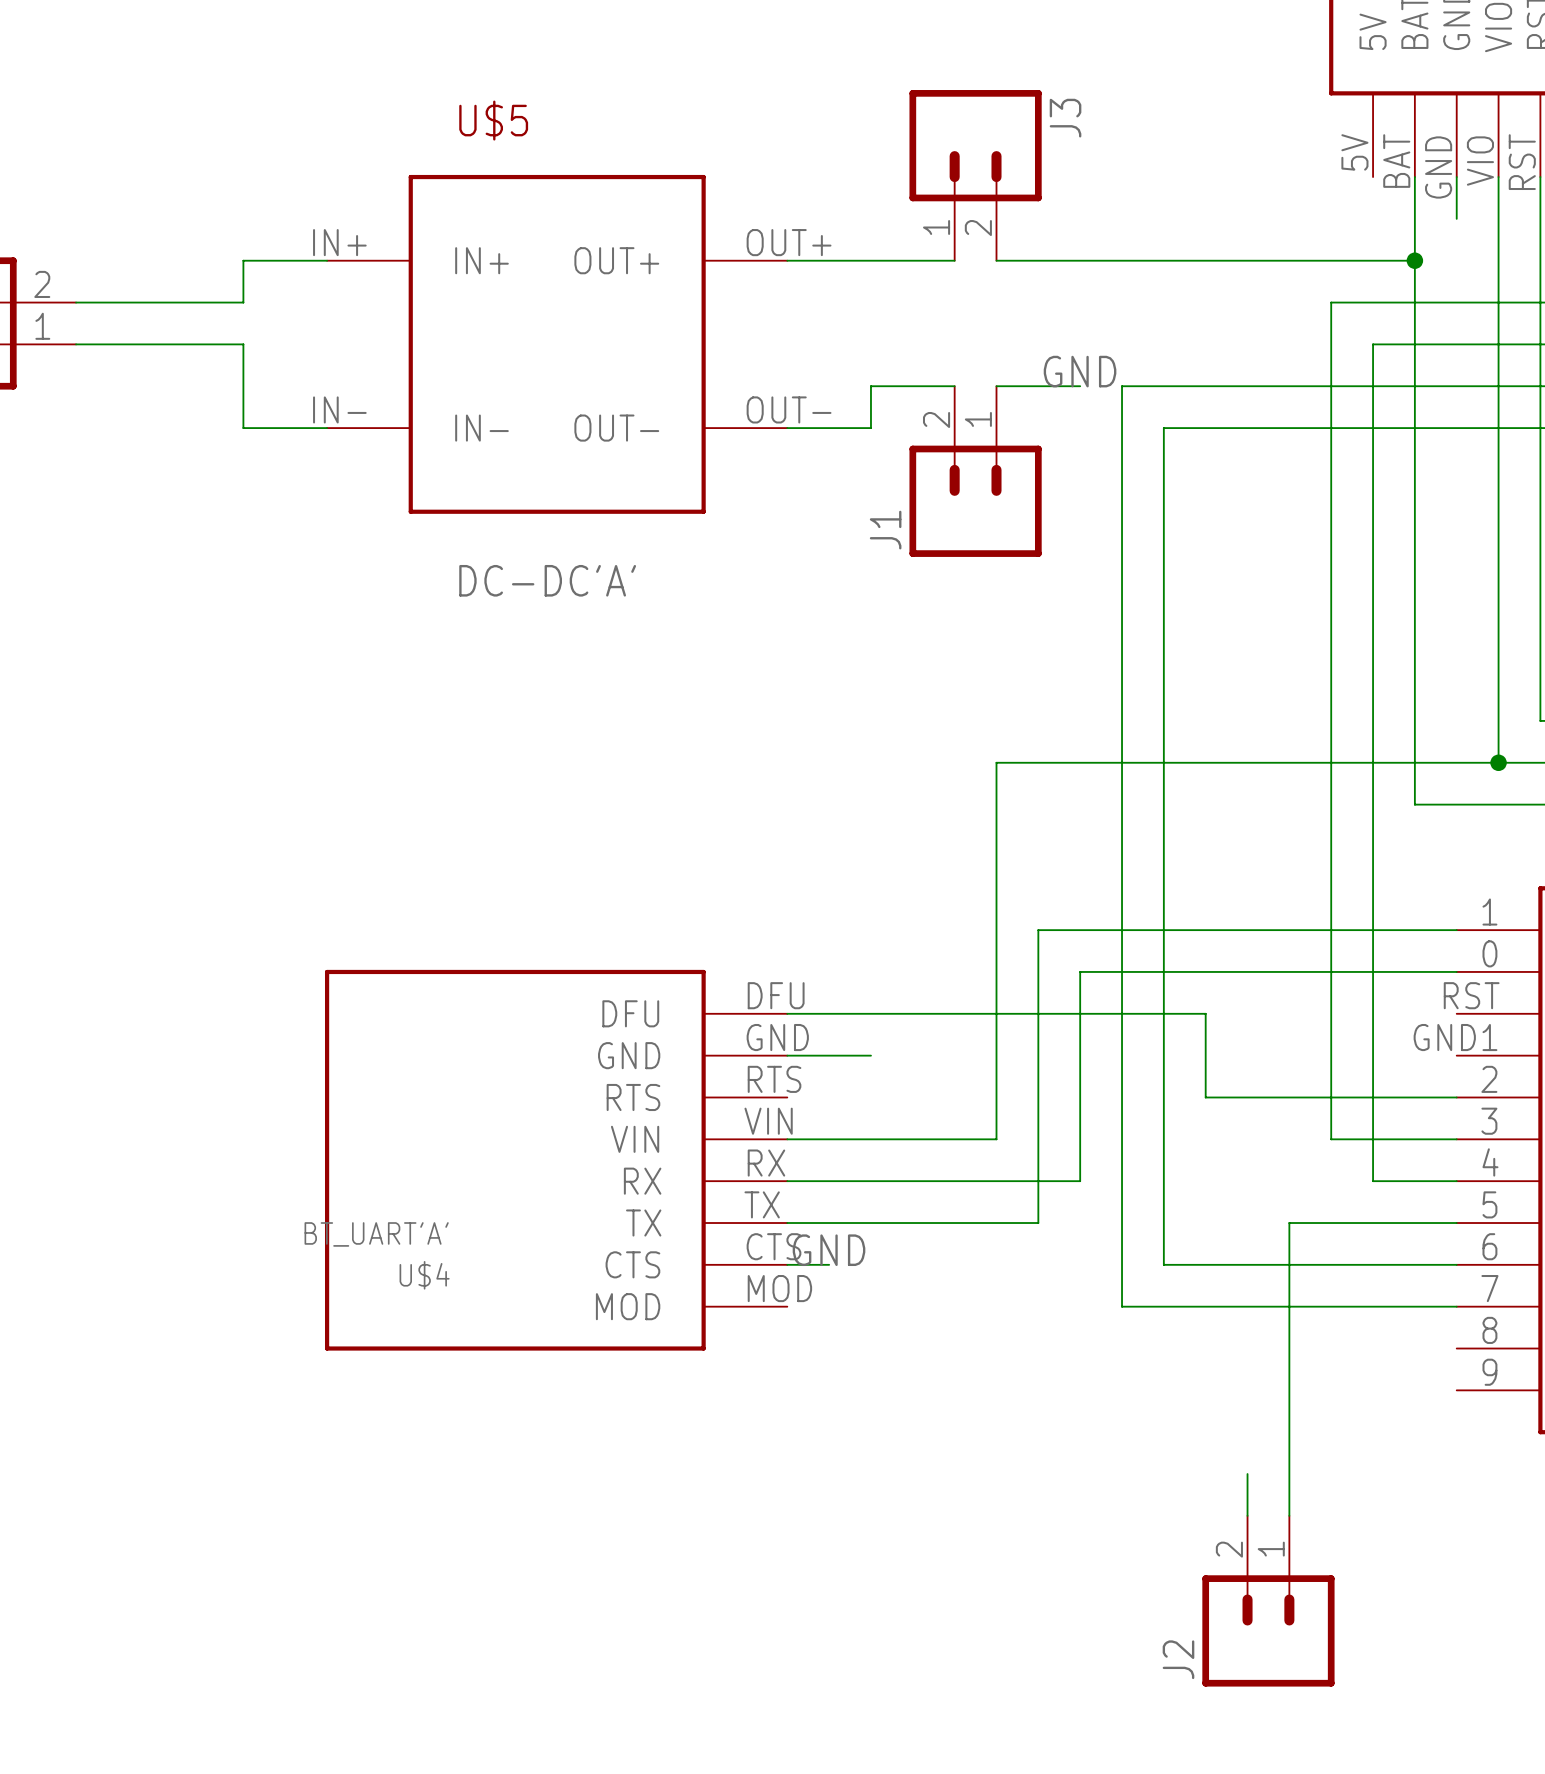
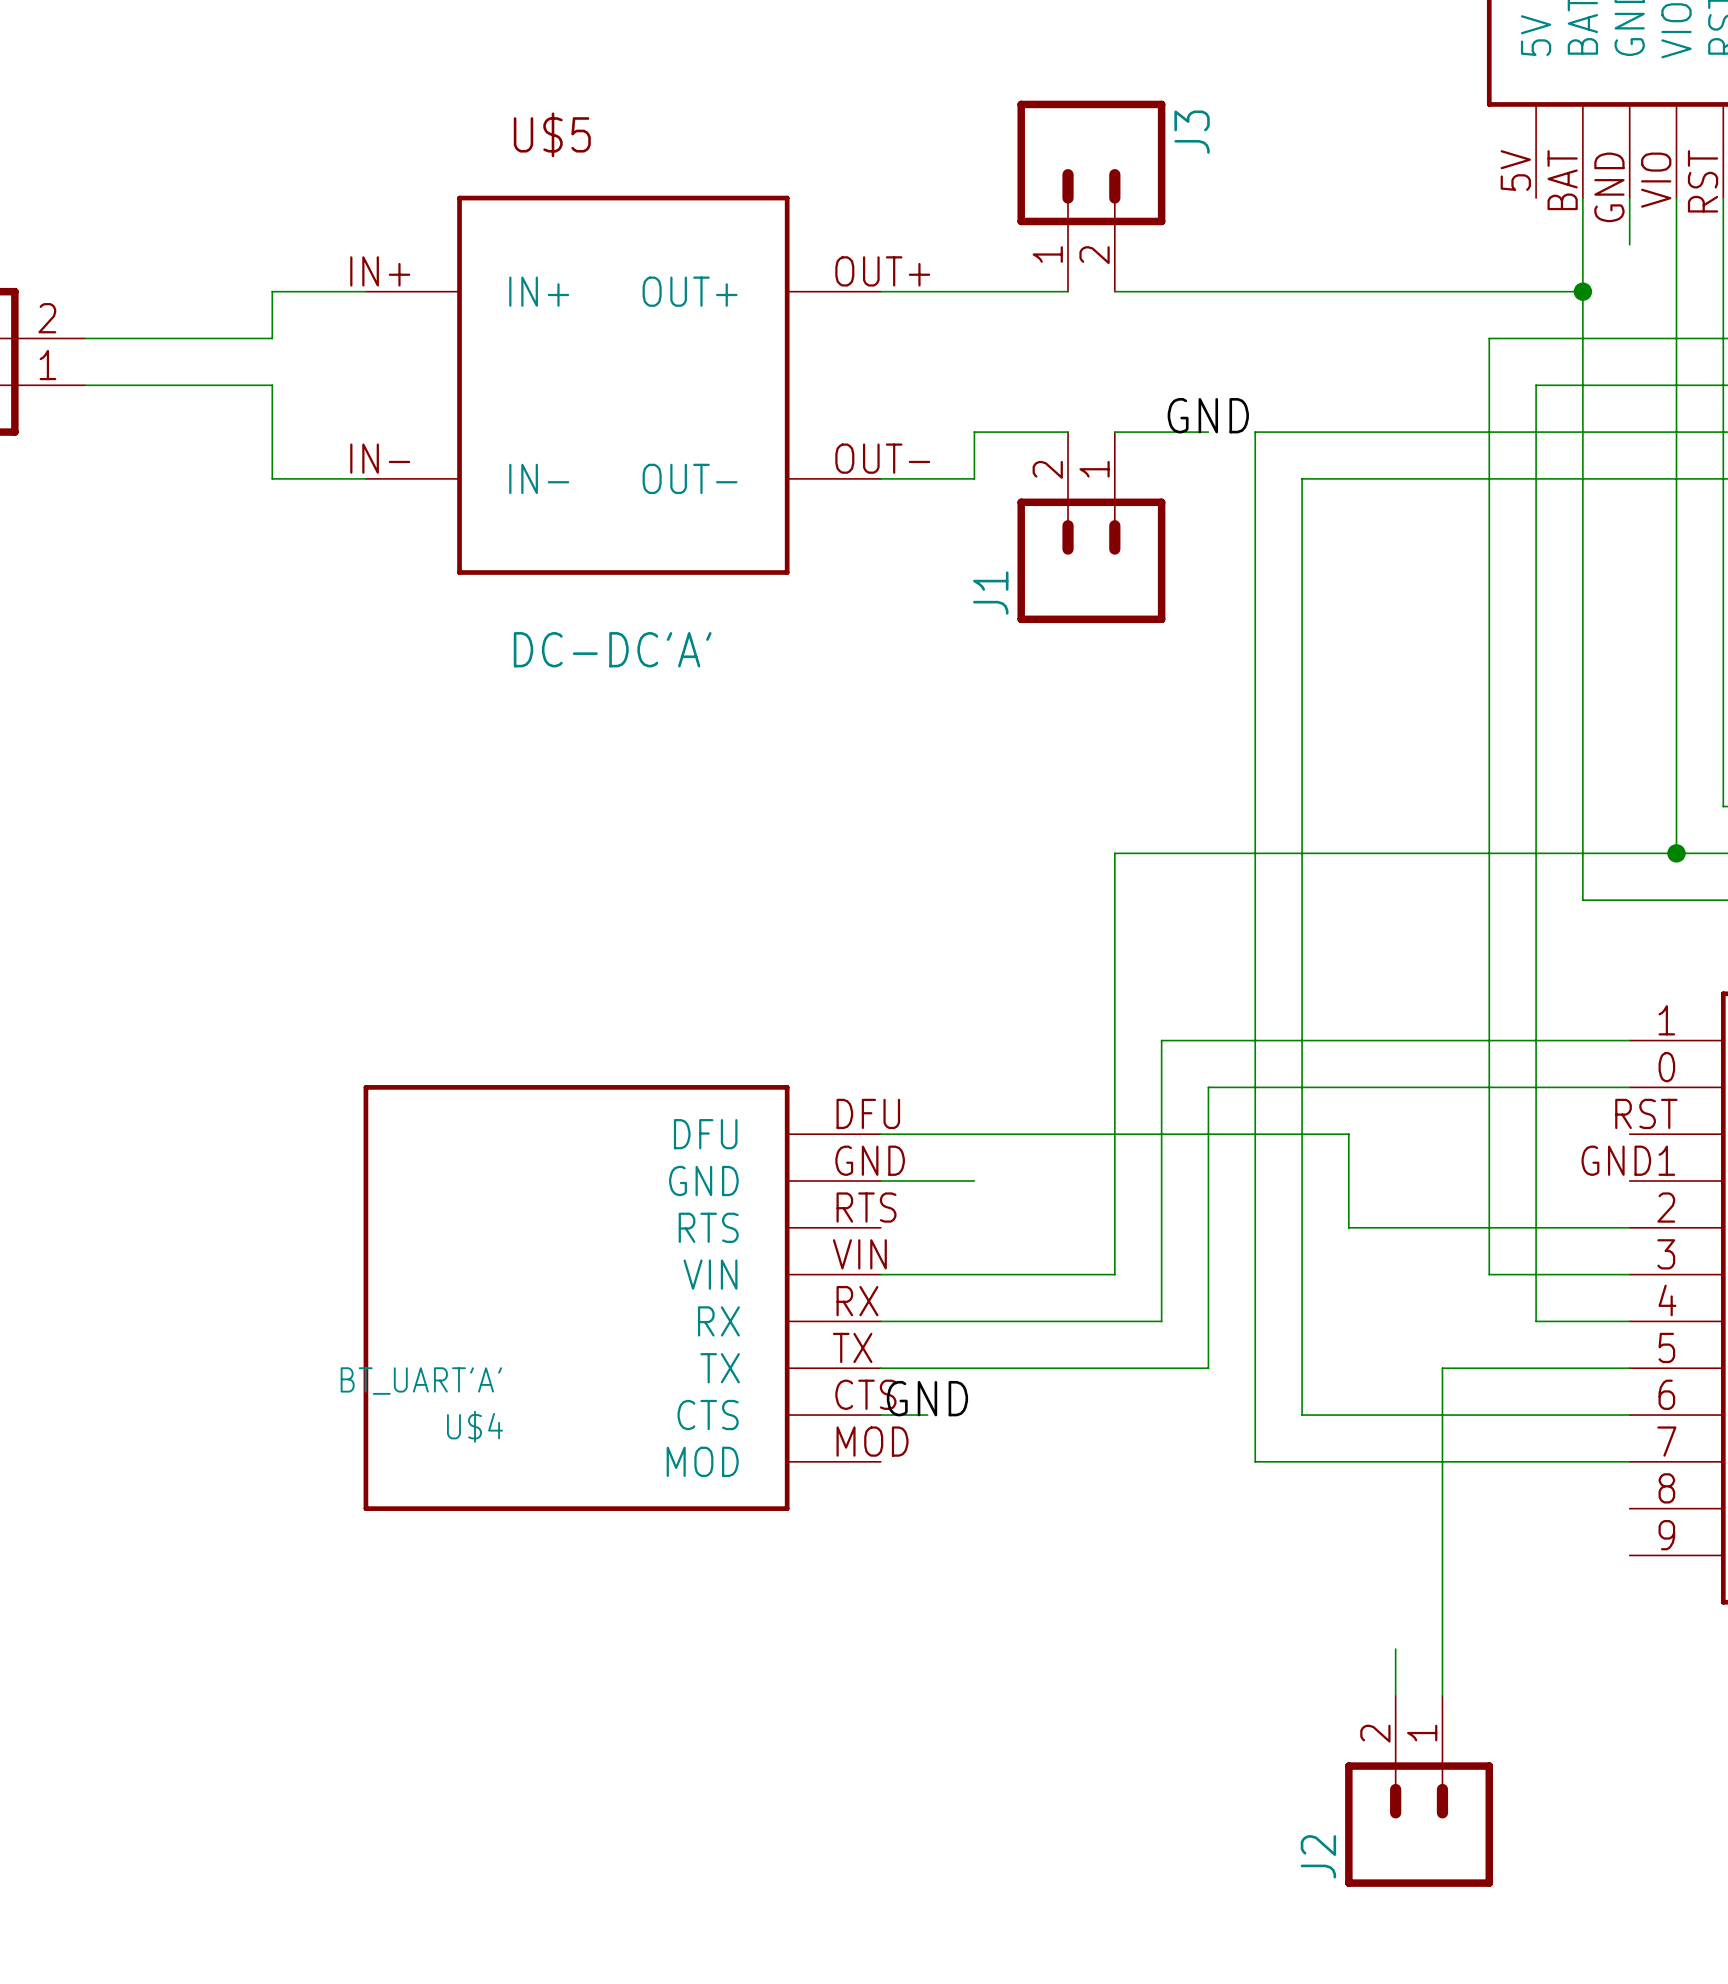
wire: (1080, 1181) (1038, 1181) (1038, 1223) -> (1208, 1321) (1208, 1368) (1161, 1368)

